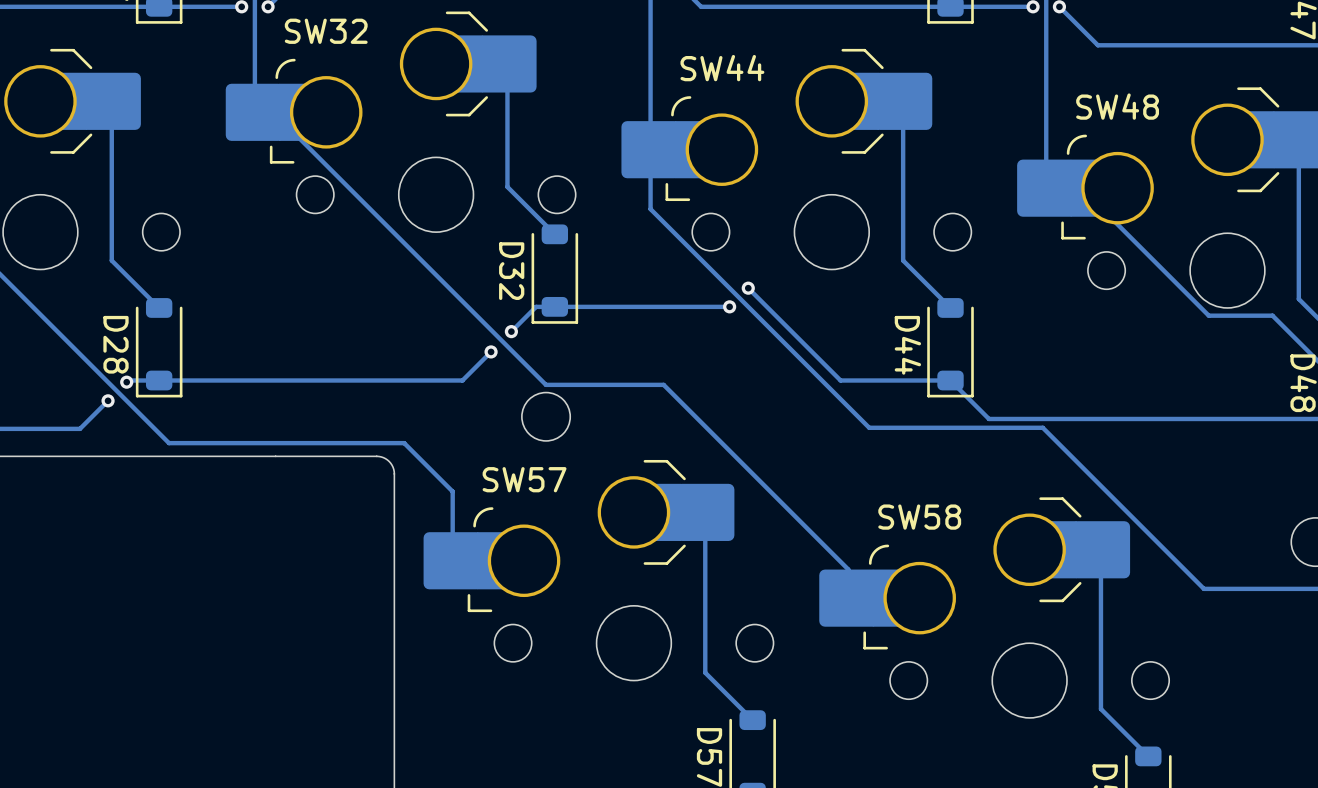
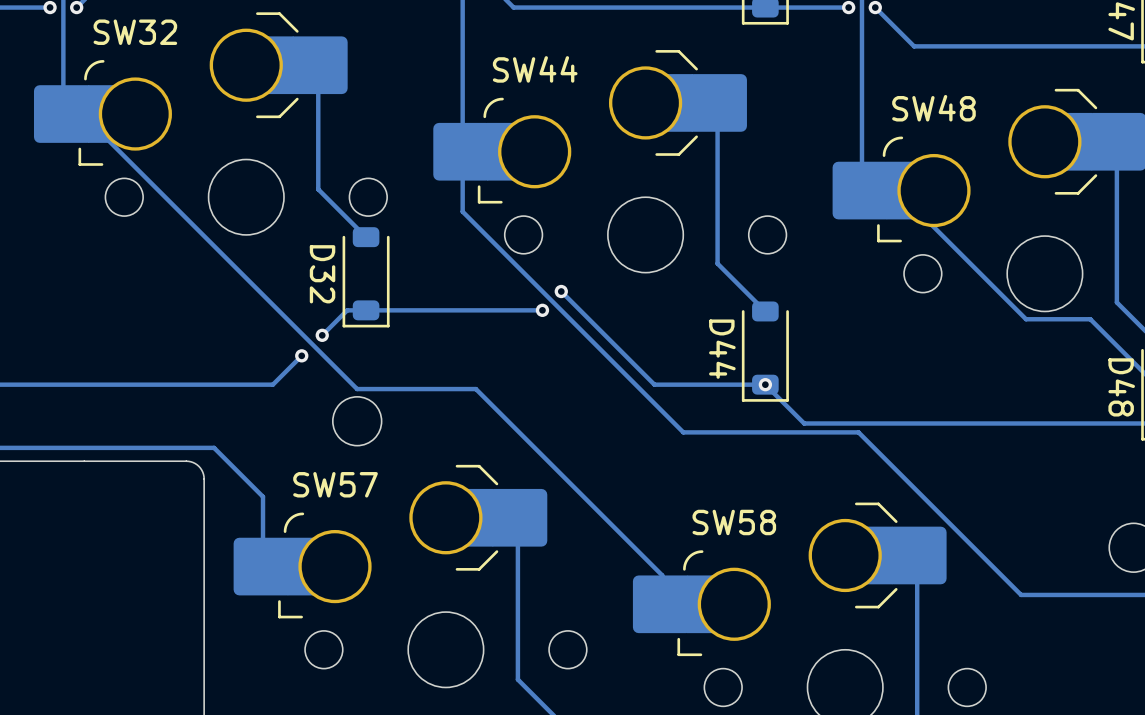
via: none -> (765, 384)

